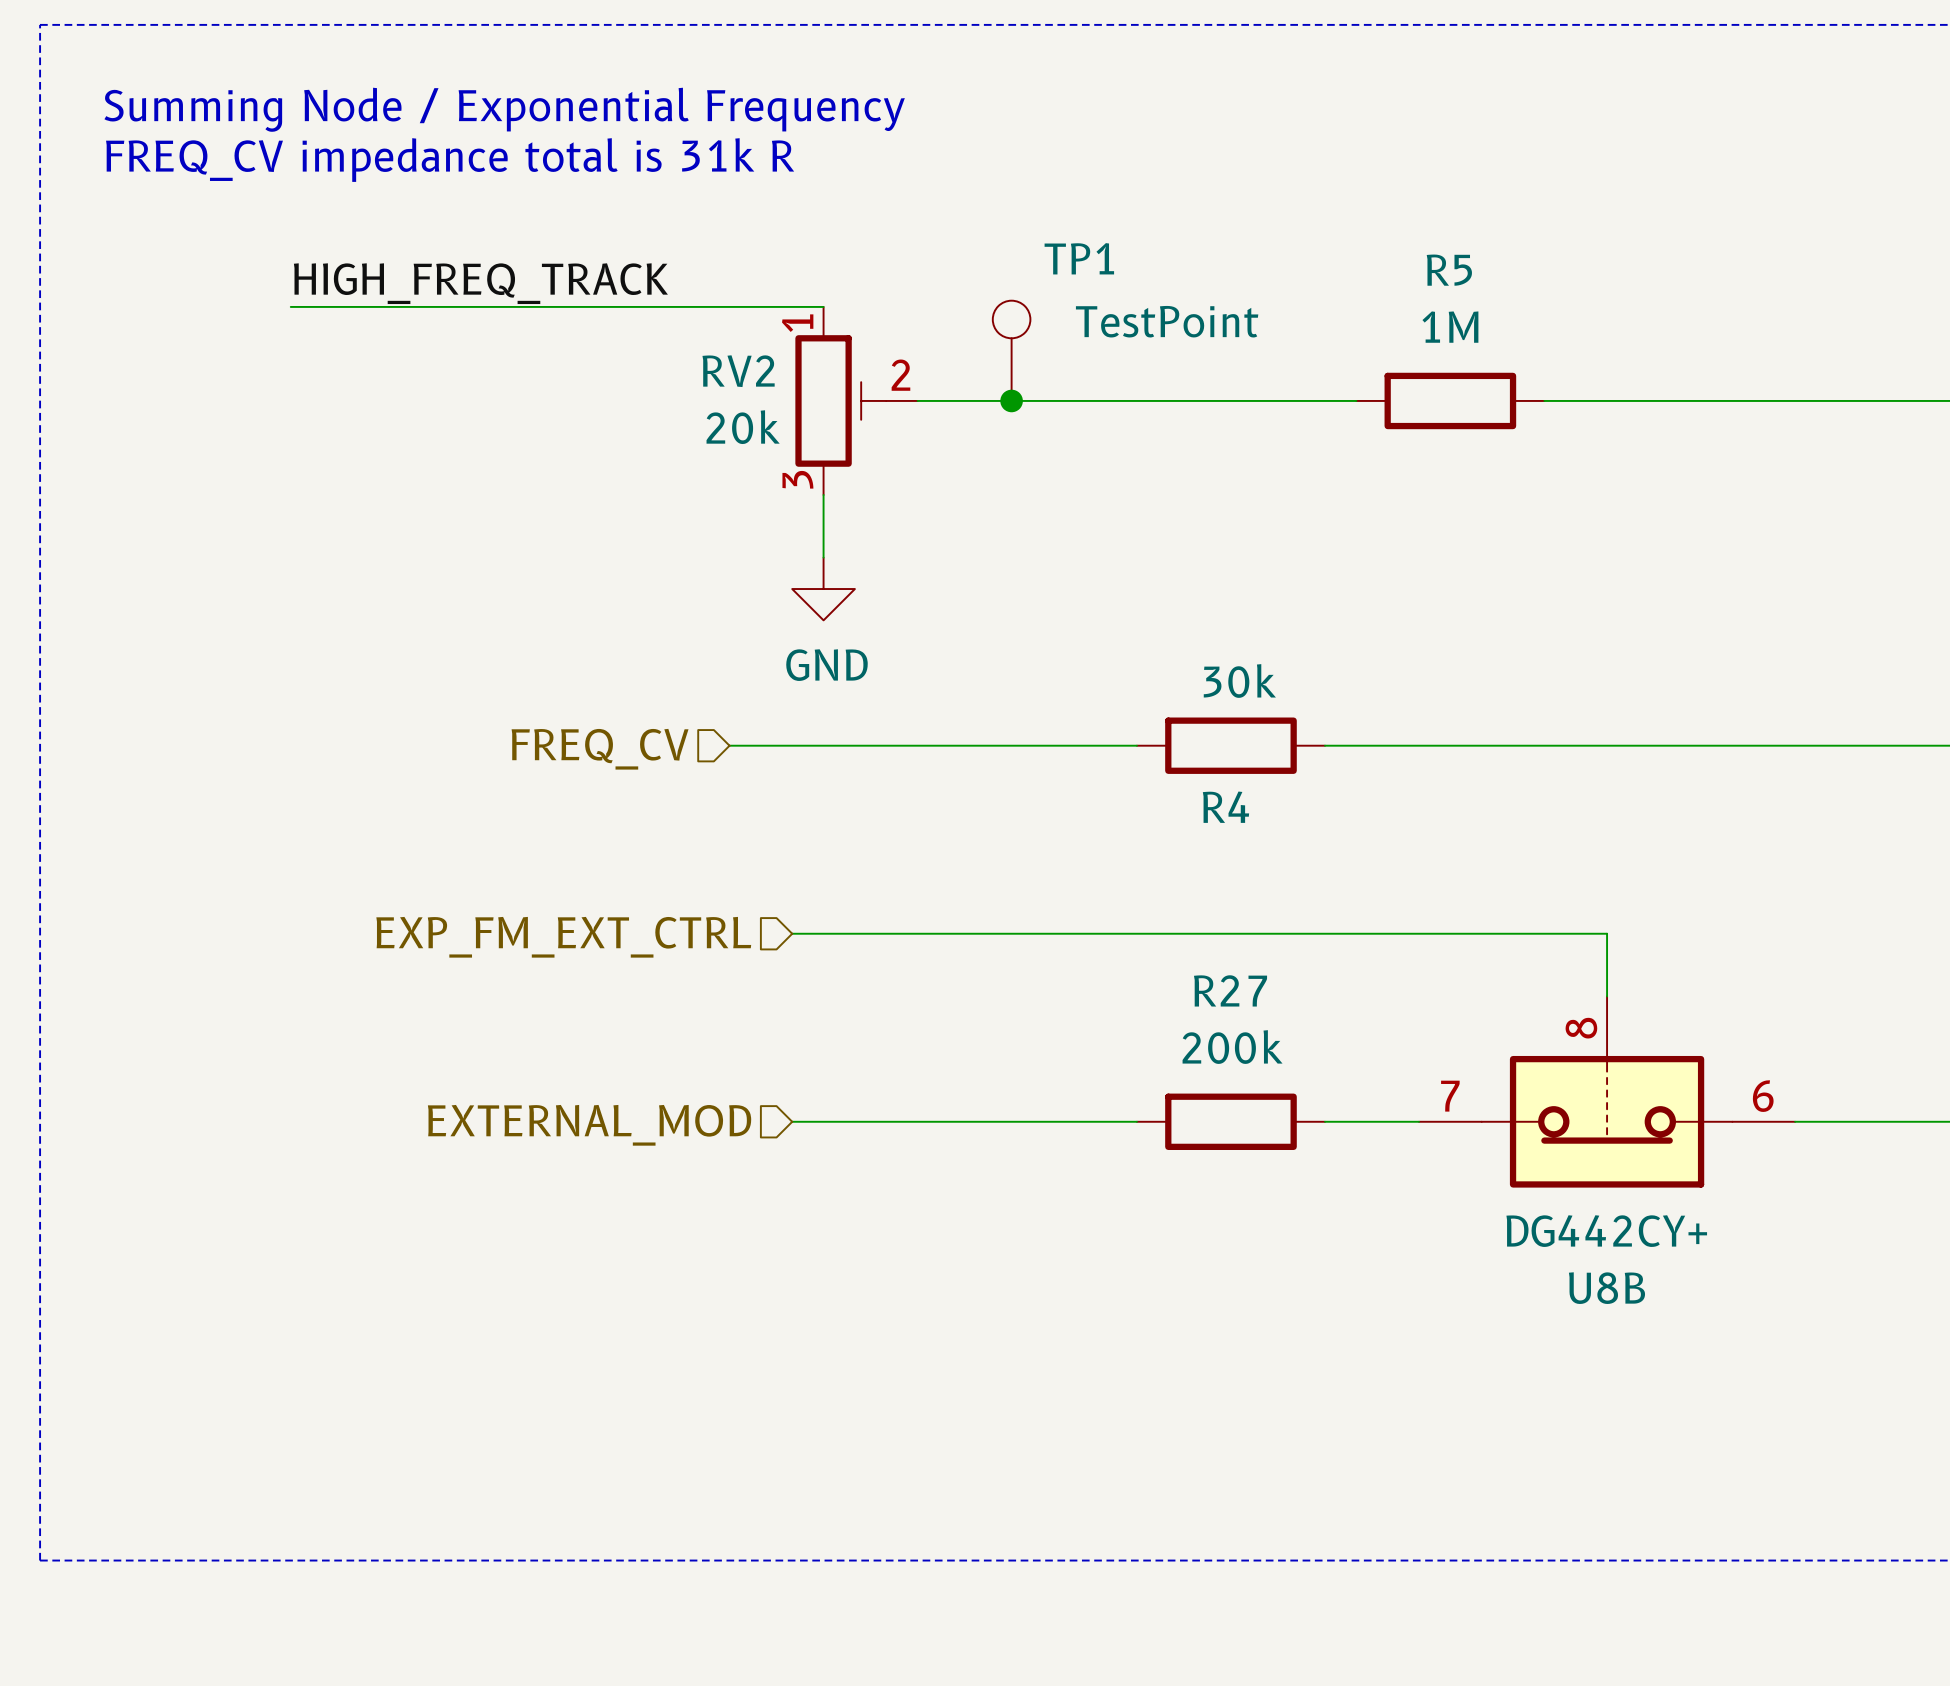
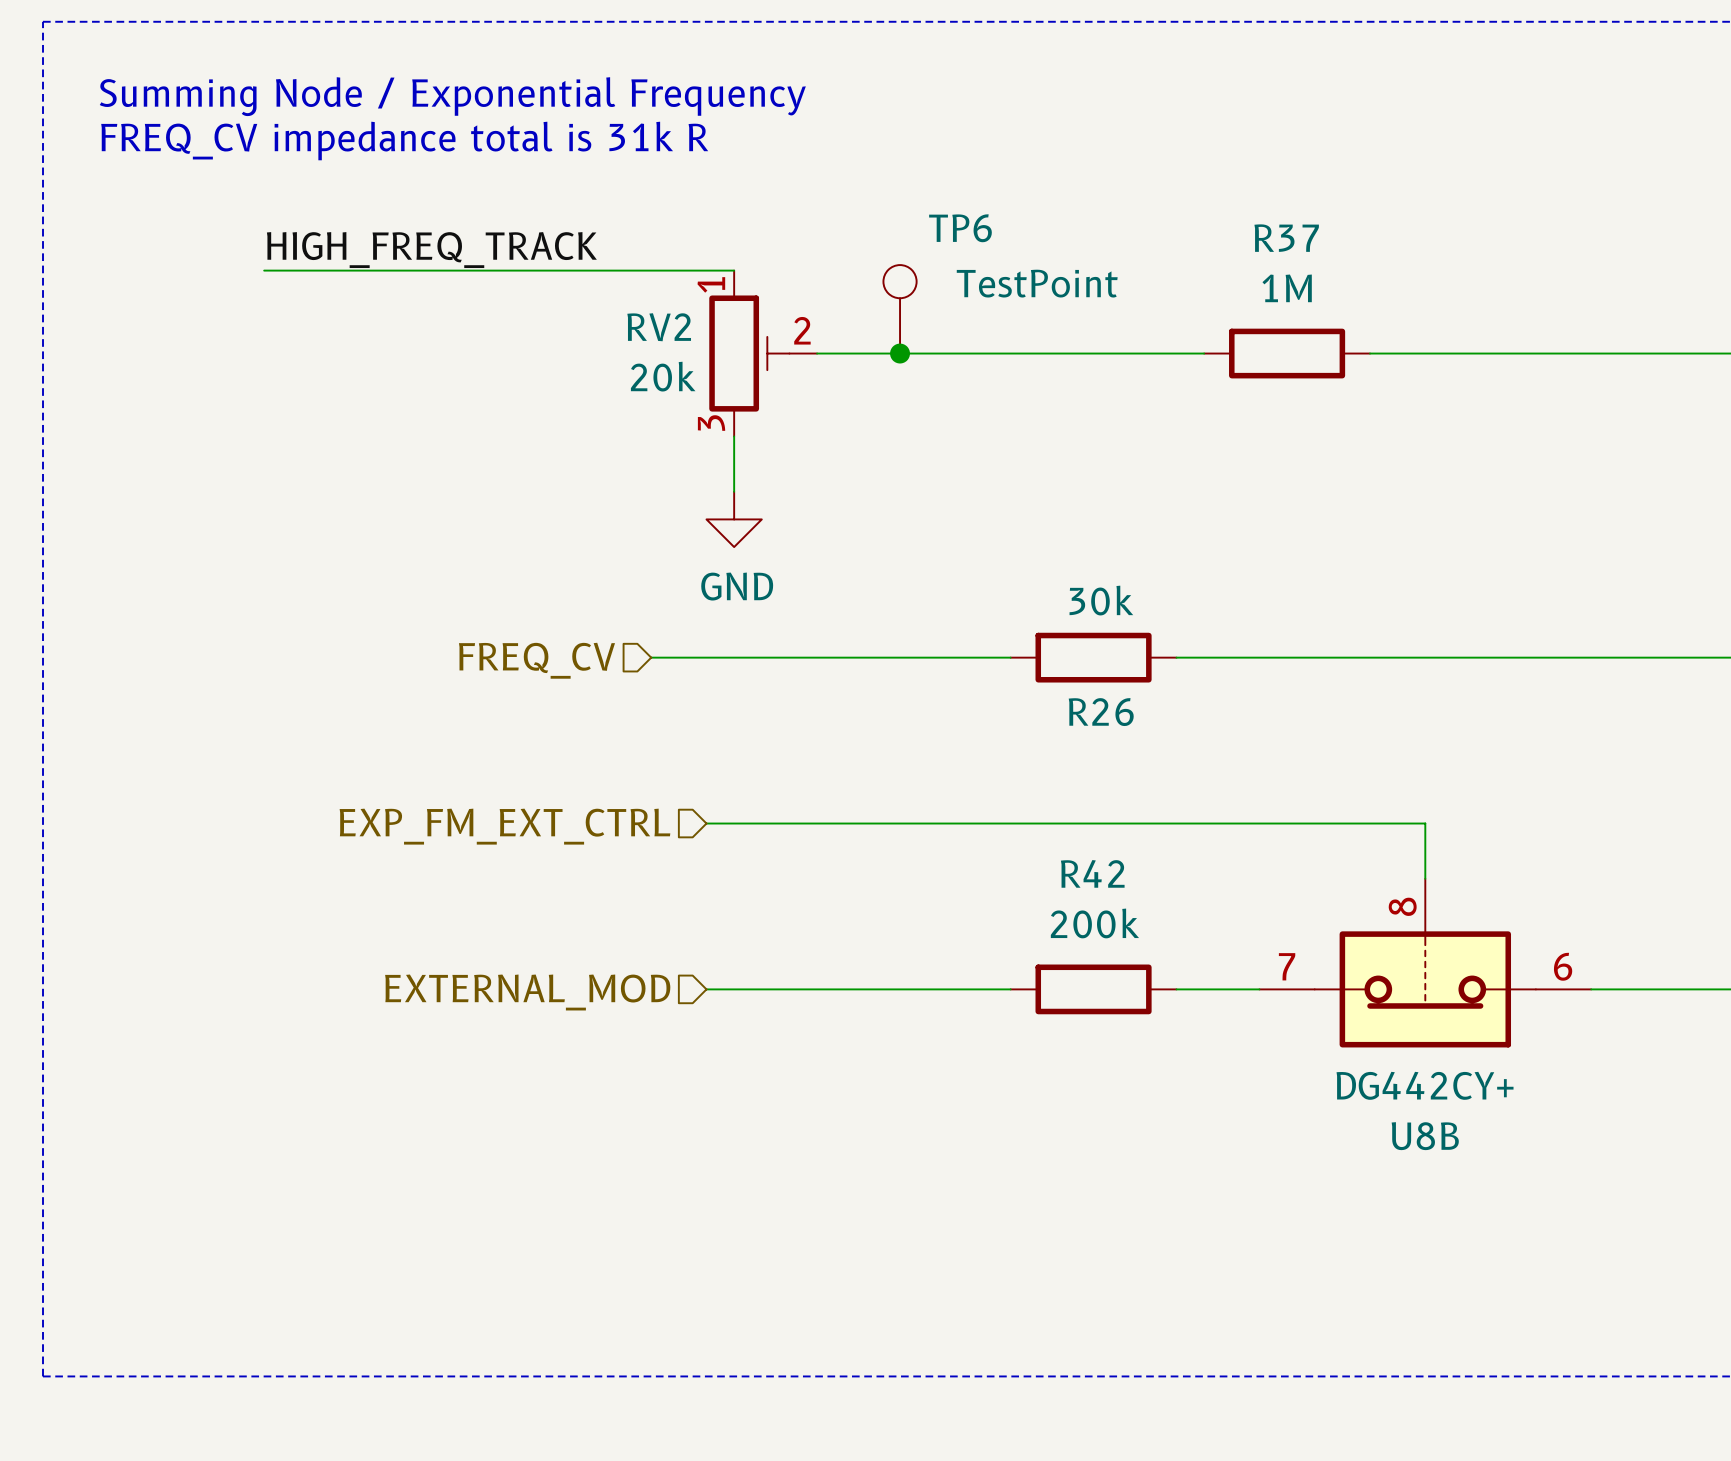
TP1 name: TP1 (1079, 258) -> TP6 (960, 228)
R5 name: R5 (1449, 270) -> R37 (1286, 238)
R4 name: R4 (1225, 807) -> R26 (1101, 712)
R27 name: R27 (1230, 990) -> R42 (1092, 873)

